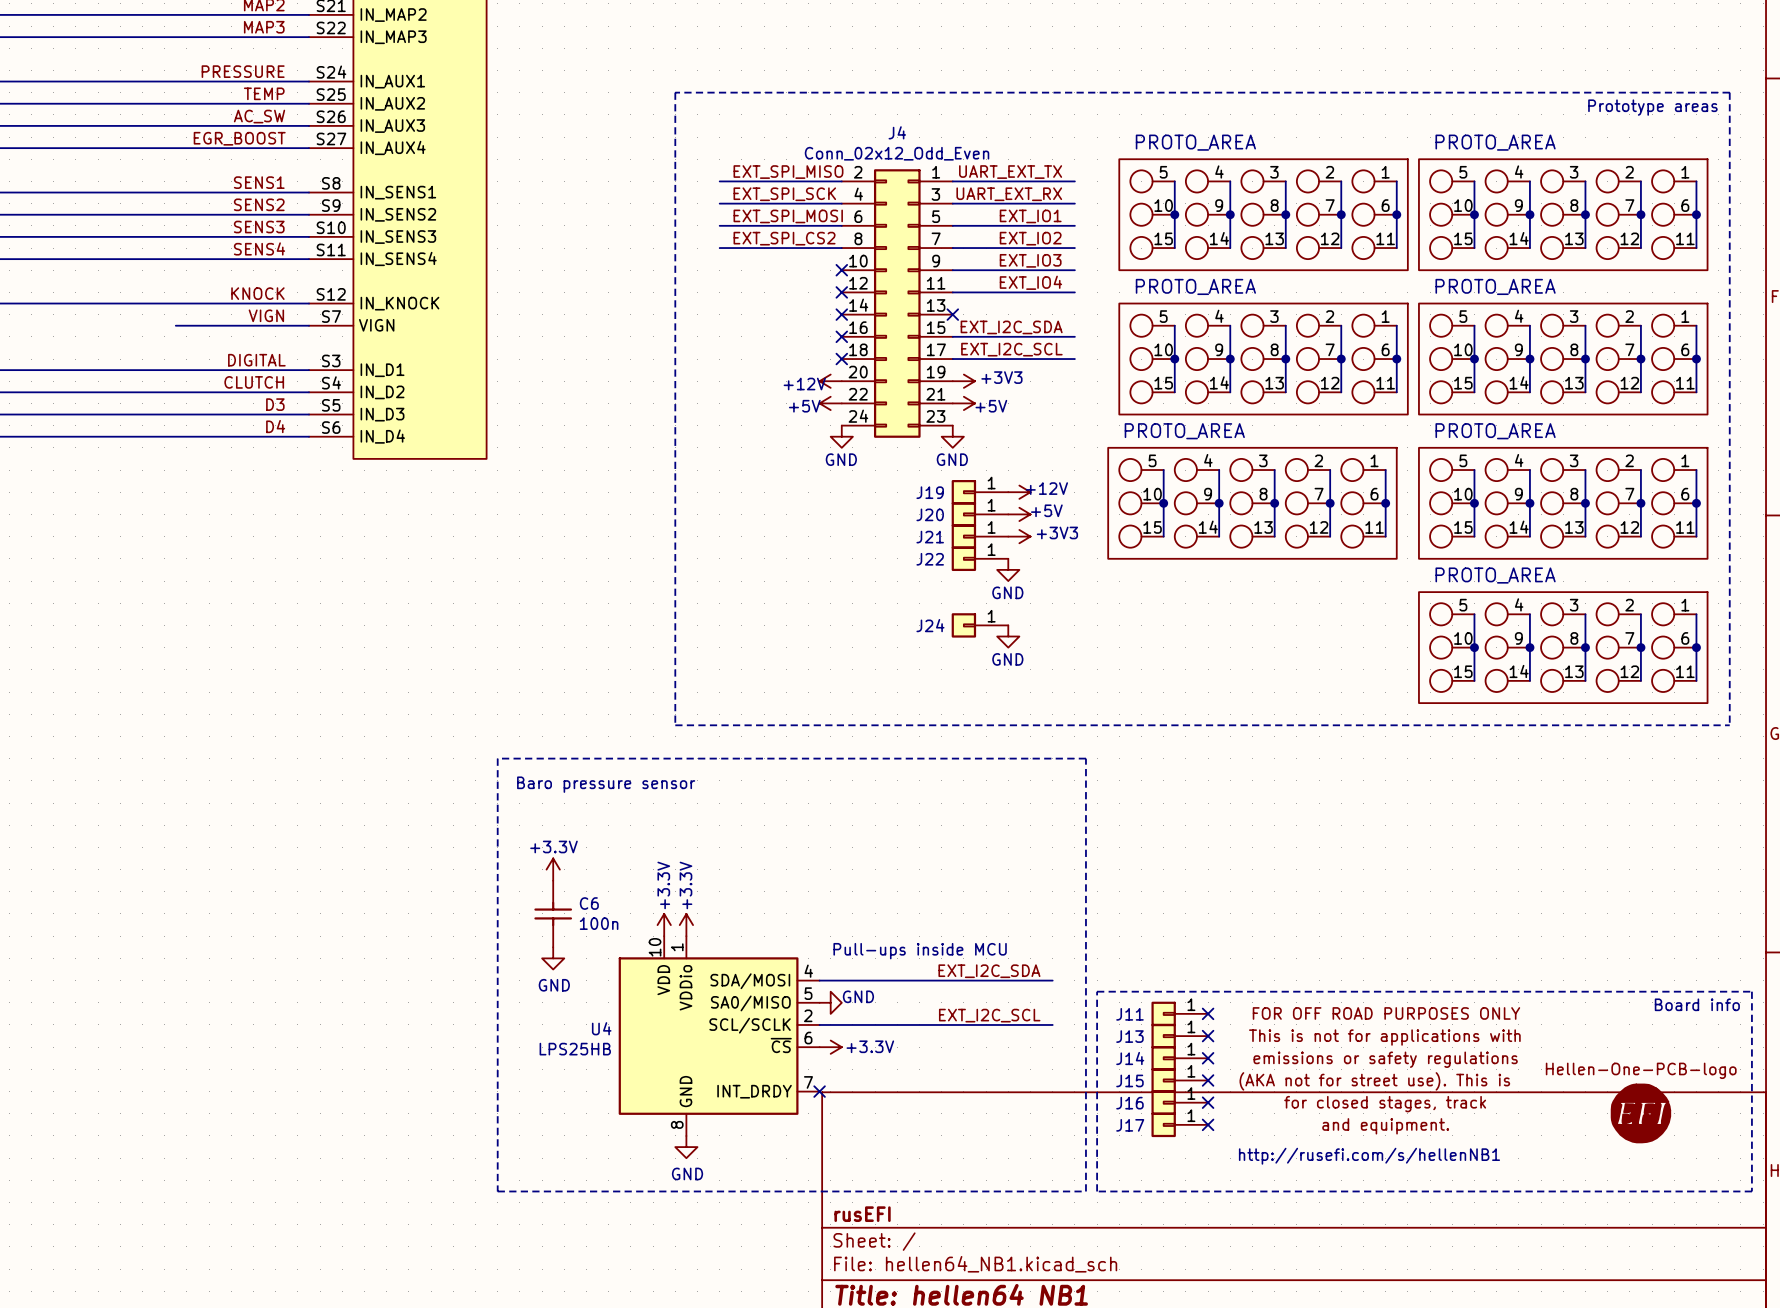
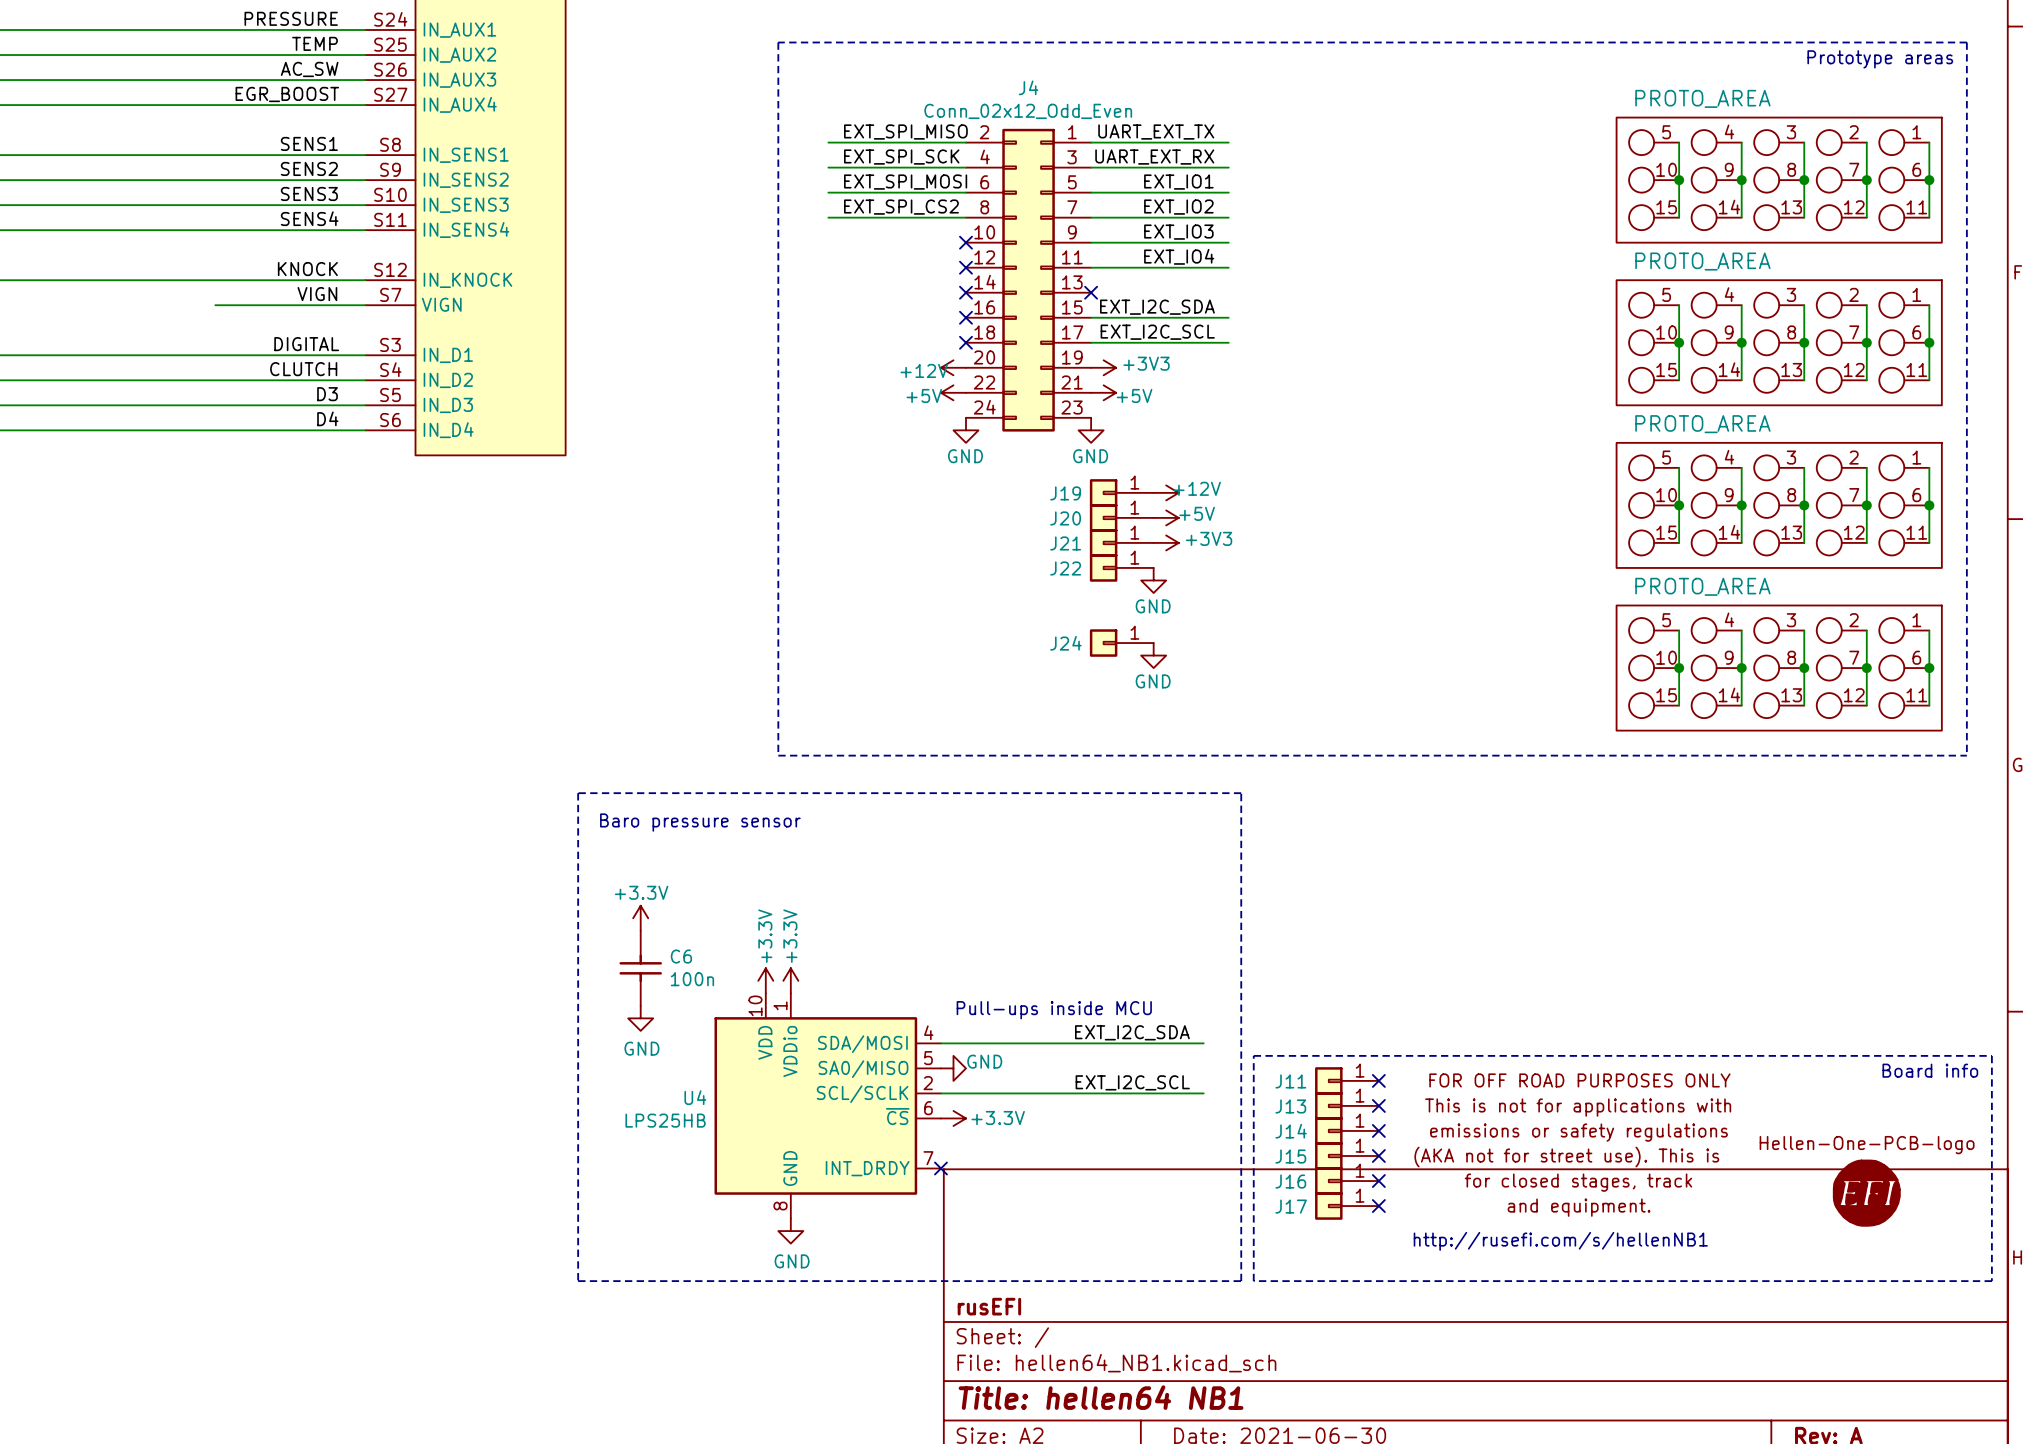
wire: (1174, 181) (1174, 248) -> none
wire: (1230, 181) (1230, 248) -> none
wire: (1285, 181) (1285, 248) -> none
wire: (1341, 181) (1341, 248) -> none
wire: (1396, 181) (1396, 248) -> none
junction: (1174, 214) -> none
junction: (1230, 214) -> none
part: PROTO_AREA (1263, 214) -> none
junction: (1285, 214) -> none
junction: (1341, 214) -> none
junction: (1396, 214) -> none
wire: (1174, 325) (1174, 392) -> none
wire: (1230, 325) (1230, 392) -> none
wire: (1285, 325) (1285, 392) -> none
wire: (1341, 325) (1341, 392) -> none
wire: (1396, 325) (1396, 392) -> none
junction: (1174, 359) -> none
junction: (1230, 359) -> none
part: PROTO_AREA (1263, 359) -> none
junction: (1285, 359) -> none
junction: (1341, 359) -> none
junction: (1396, 359) -> none
wire: (1163, 470) (1163, 536) -> none
wire: (1219, 470) (1219, 536) -> none
wire: (1274, 470) (1274, 536) -> none
wire: (1330, 470) (1330, 536) -> none
wire: (1385, 470) (1385, 536) -> none
junction: (1163, 503) -> none
junction: (1219, 503) -> none
part: PROTO_AREA (1252, 503) -> none
junction: (1274, 503) -> none
junction: (1330, 503) -> none
junction: (1385, 503) -> none

